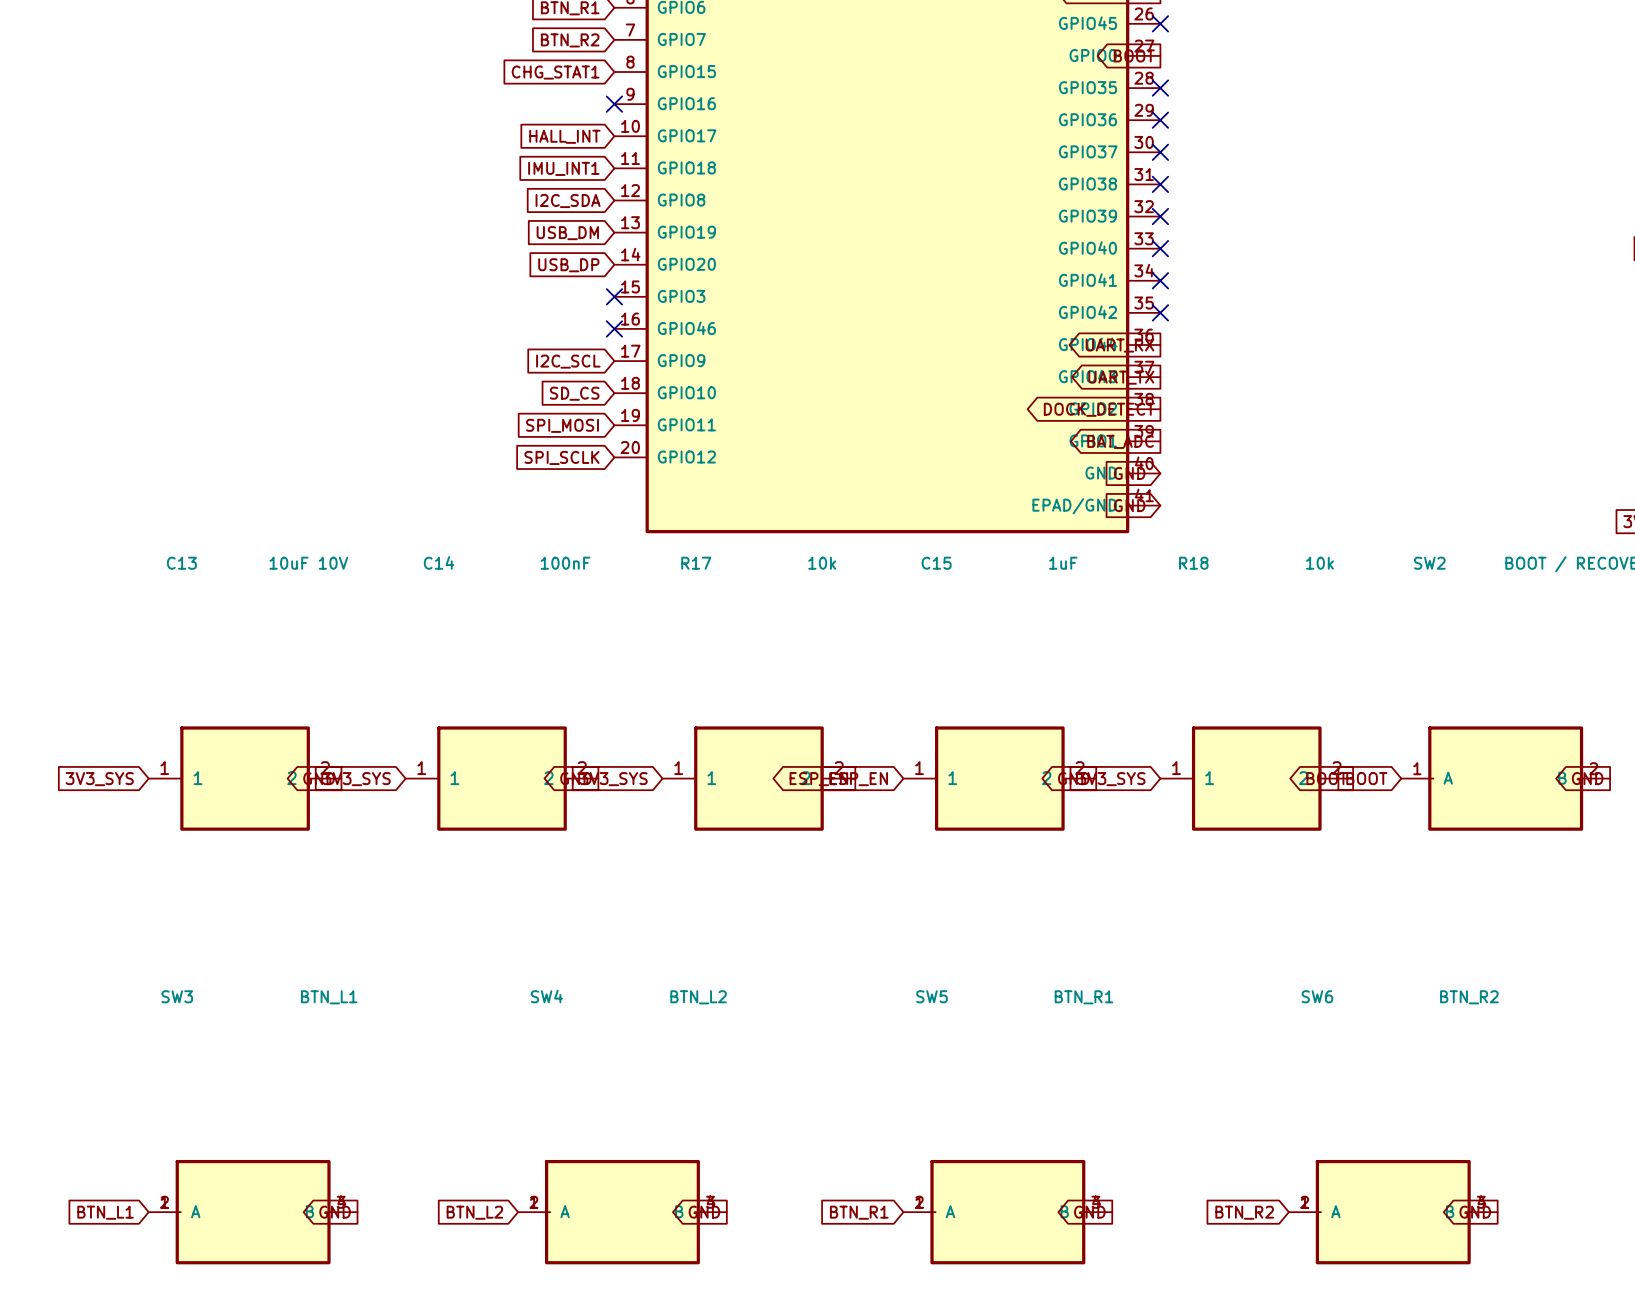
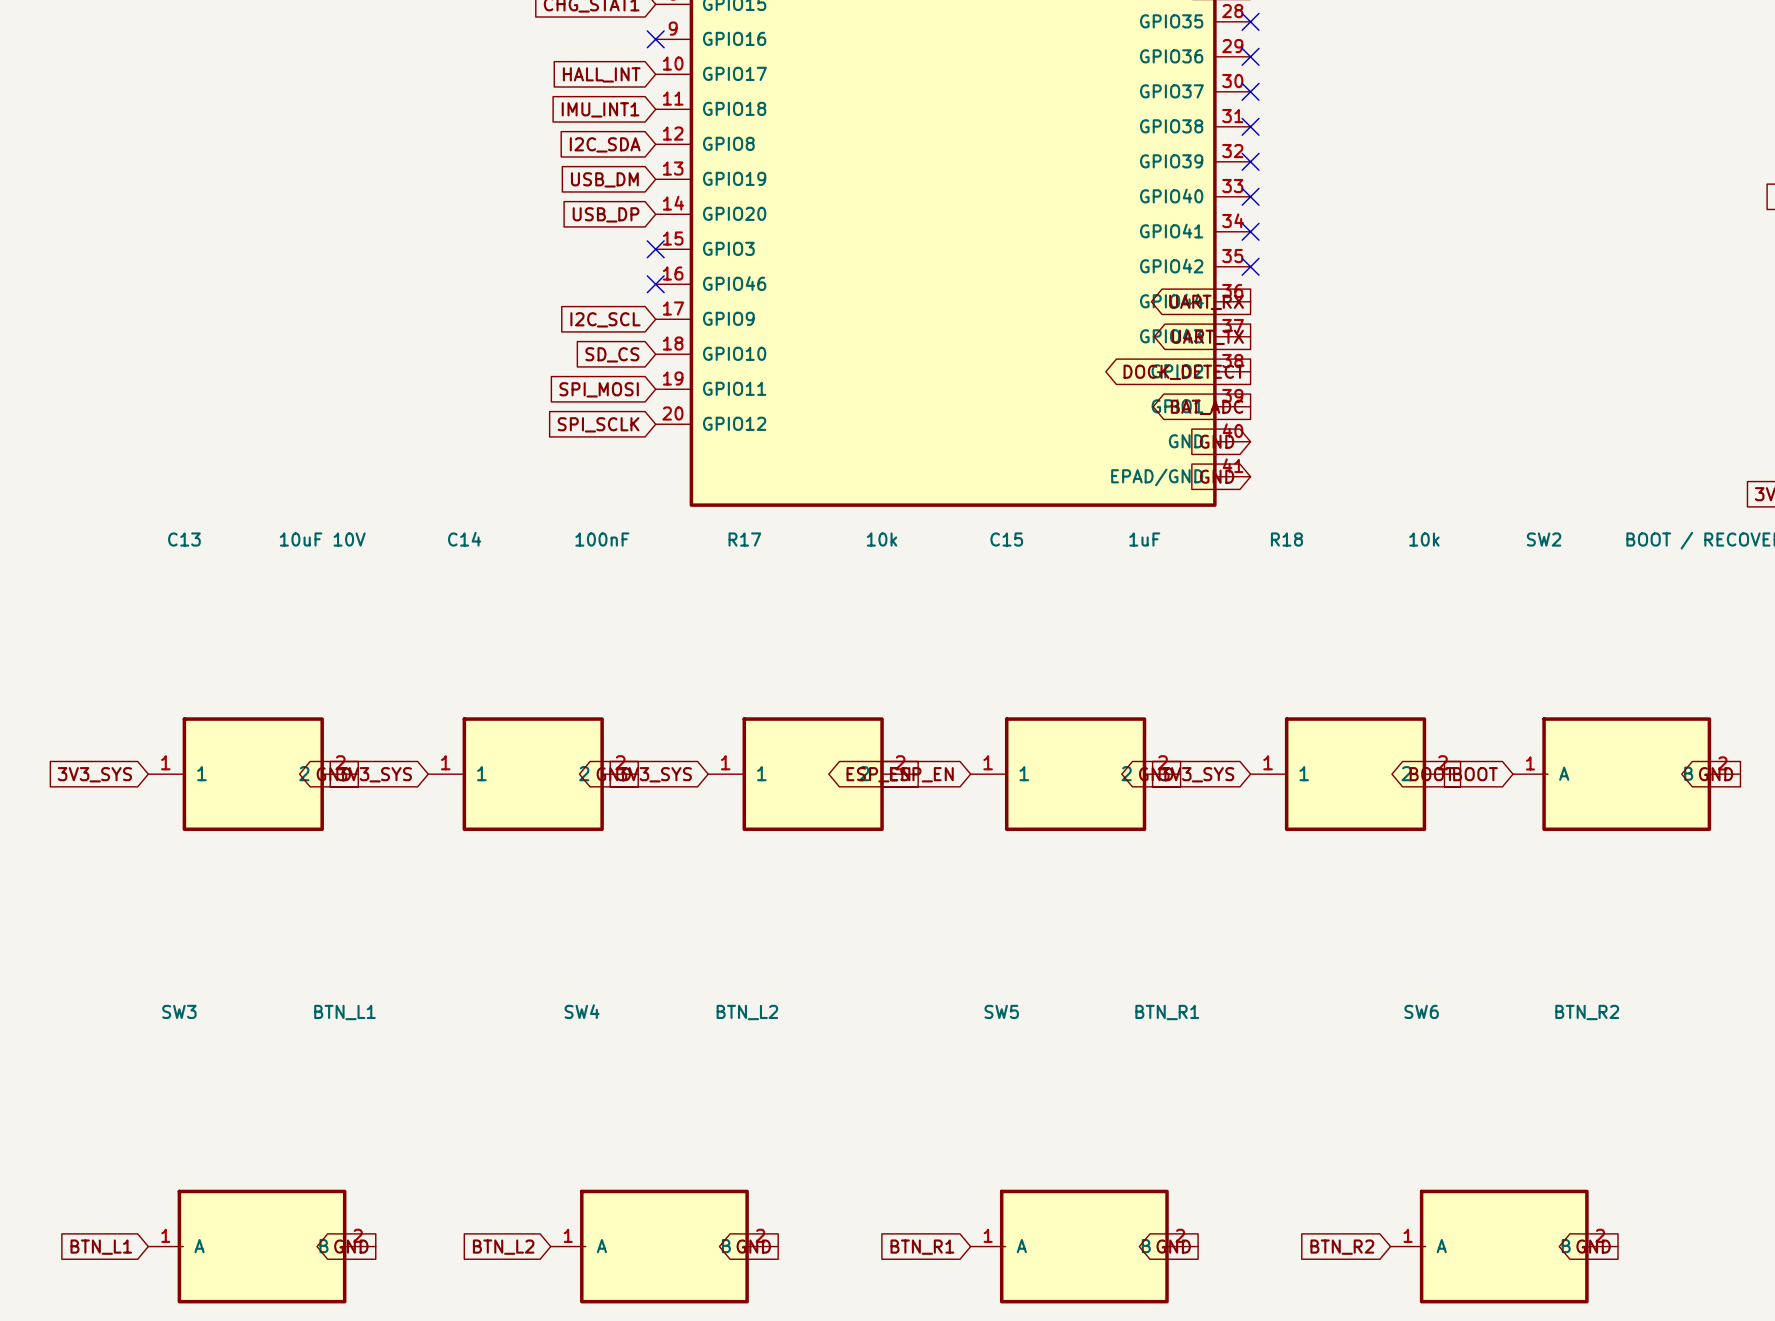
SW3 symbol: [148, 1159, 358, 1265] -> [148, 1189, 376, 1304]
SW4 symbol: [518, 1159, 727, 1265] -> [550, 1189, 779, 1304]
SW5 symbol: [903, 1159, 1113, 1265] -> [970, 1189, 1199, 1304]
SW6 symbol: [1288, 1159, 1498, 1265] -> [1390, 1189, 1618, 1304]

